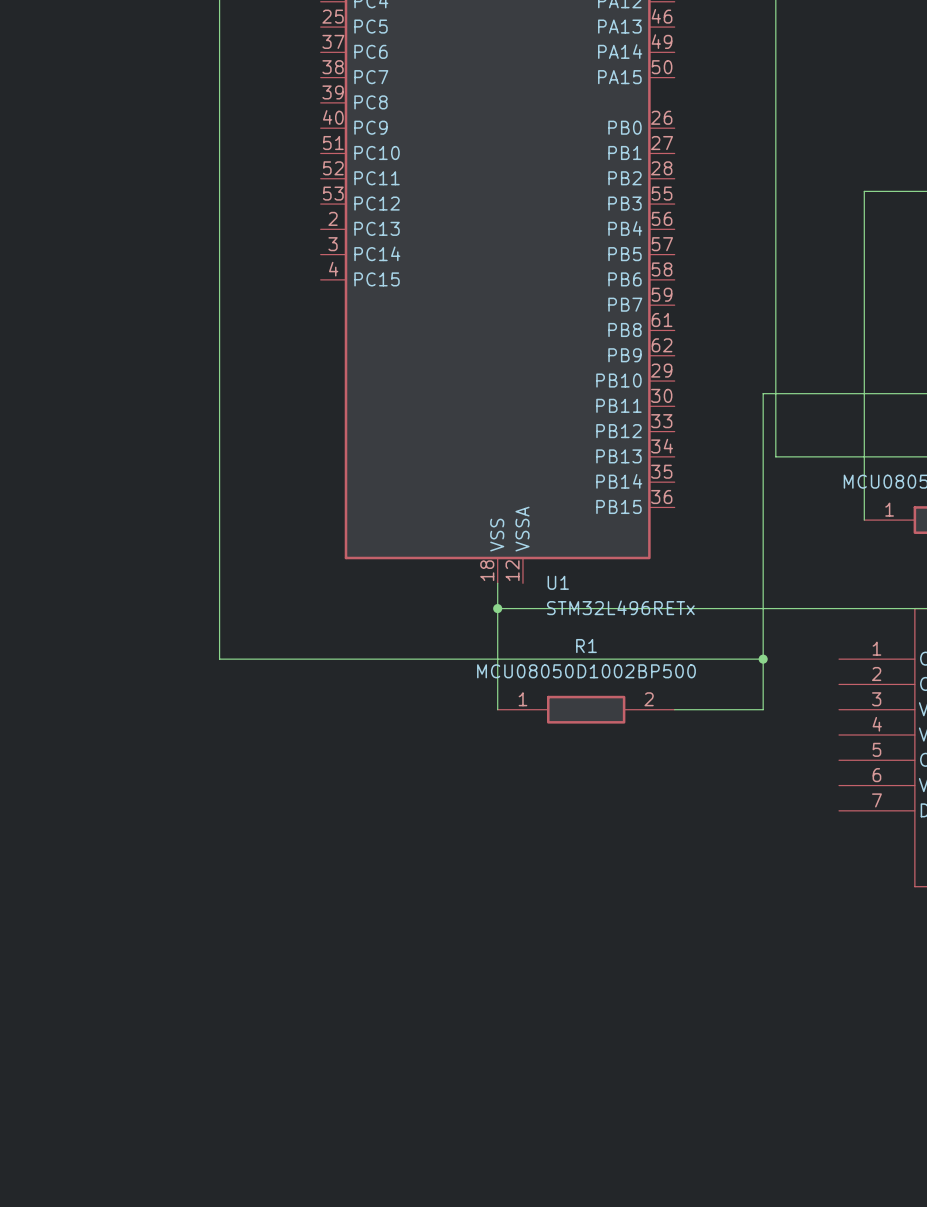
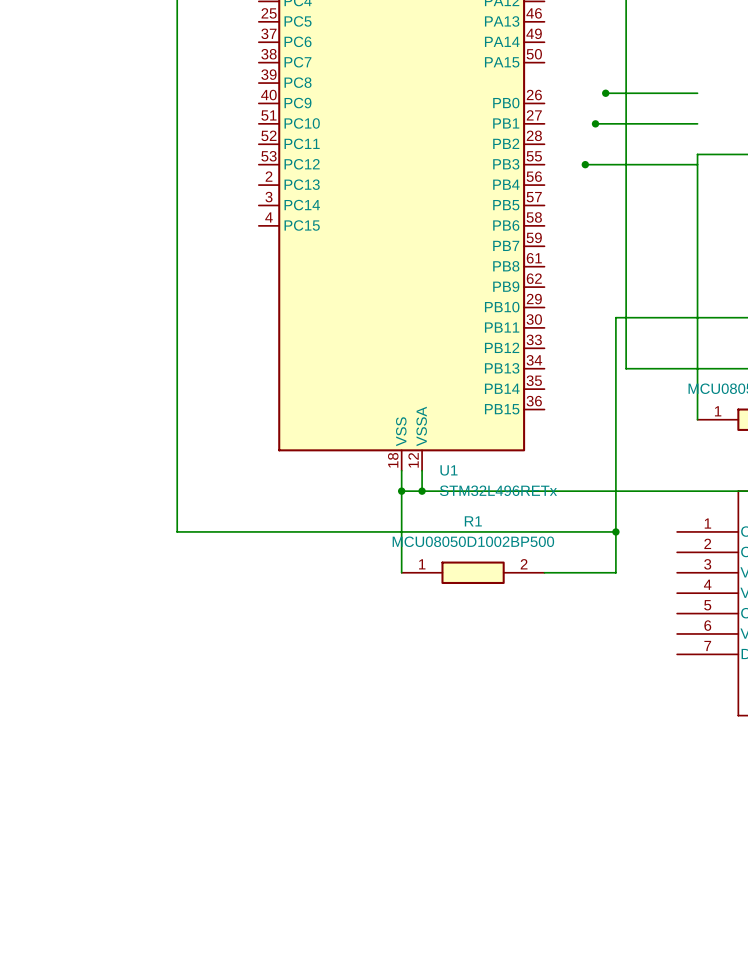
wire: none -> (605, 93) (697, 93)
junction: none -> (605, 93)
wire: none -> (595, 123) (697, 123)
junction: none -> (595, 123)
wire: none -> (585, 164) (697, 164)
junction: none -> (585, 164)
wire: none -> (422, 470) (422, 491)
junction: none -> (422, 491)

